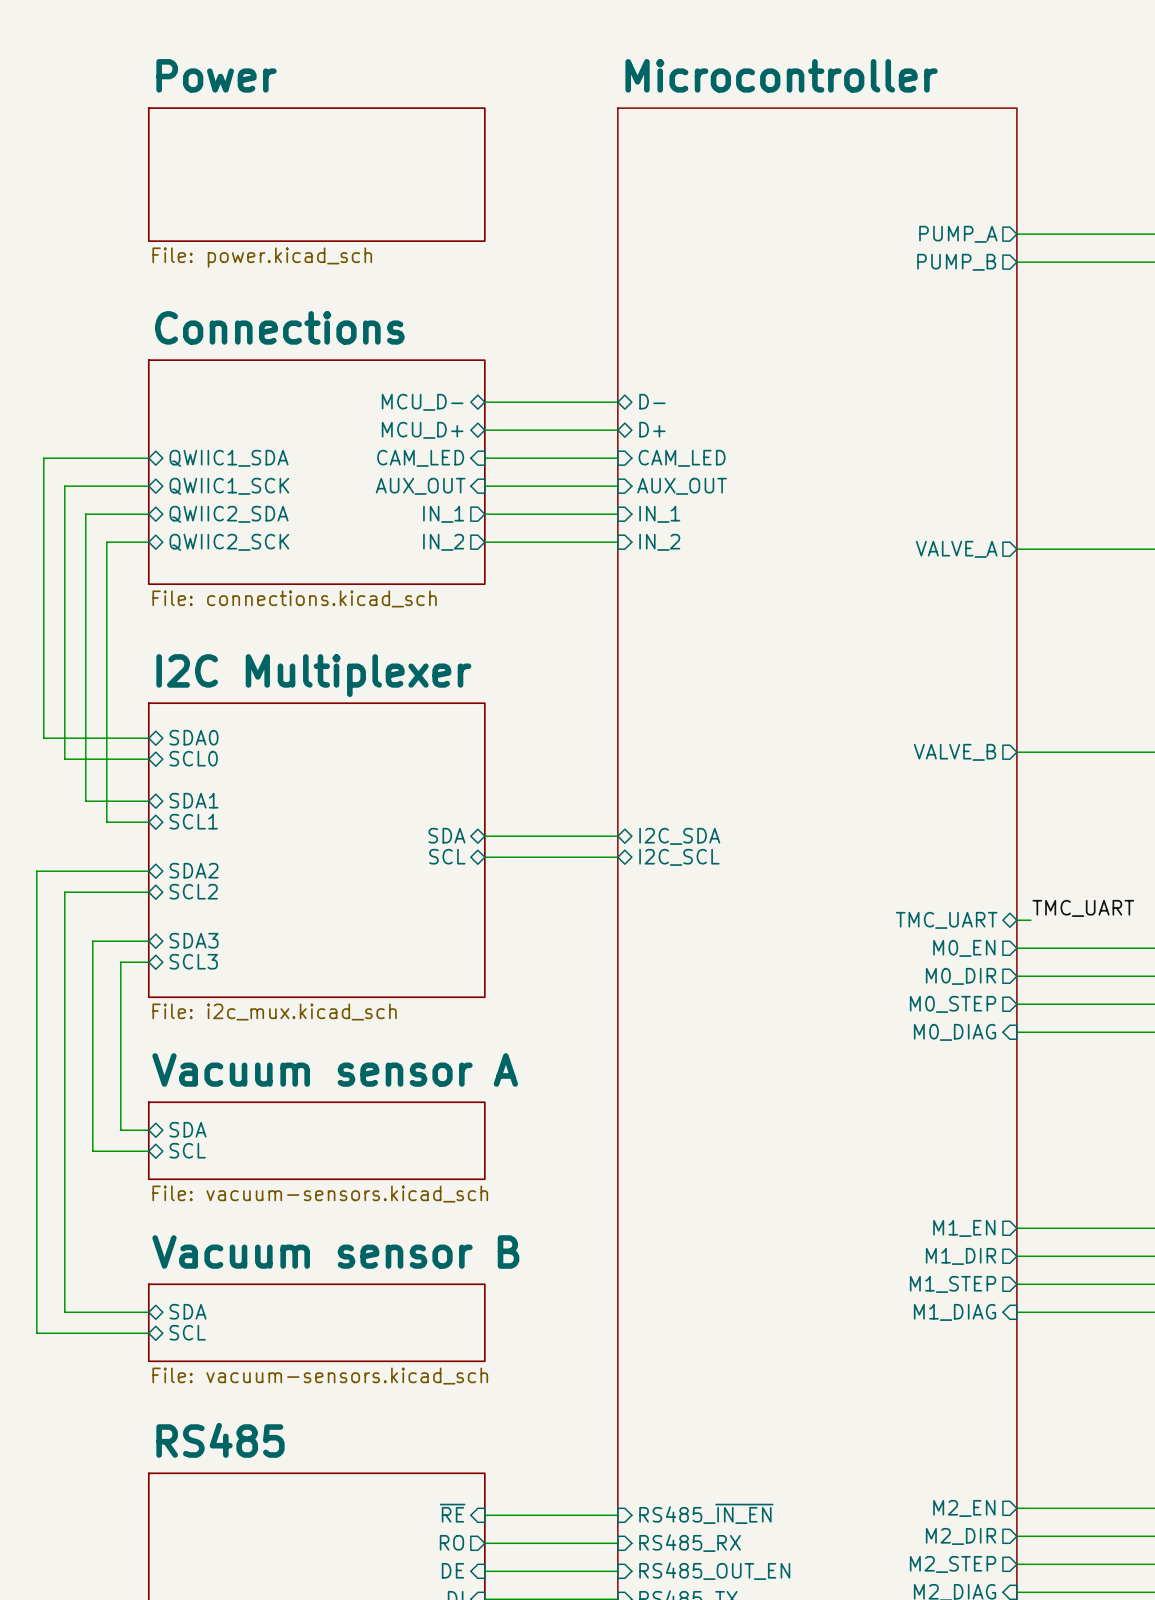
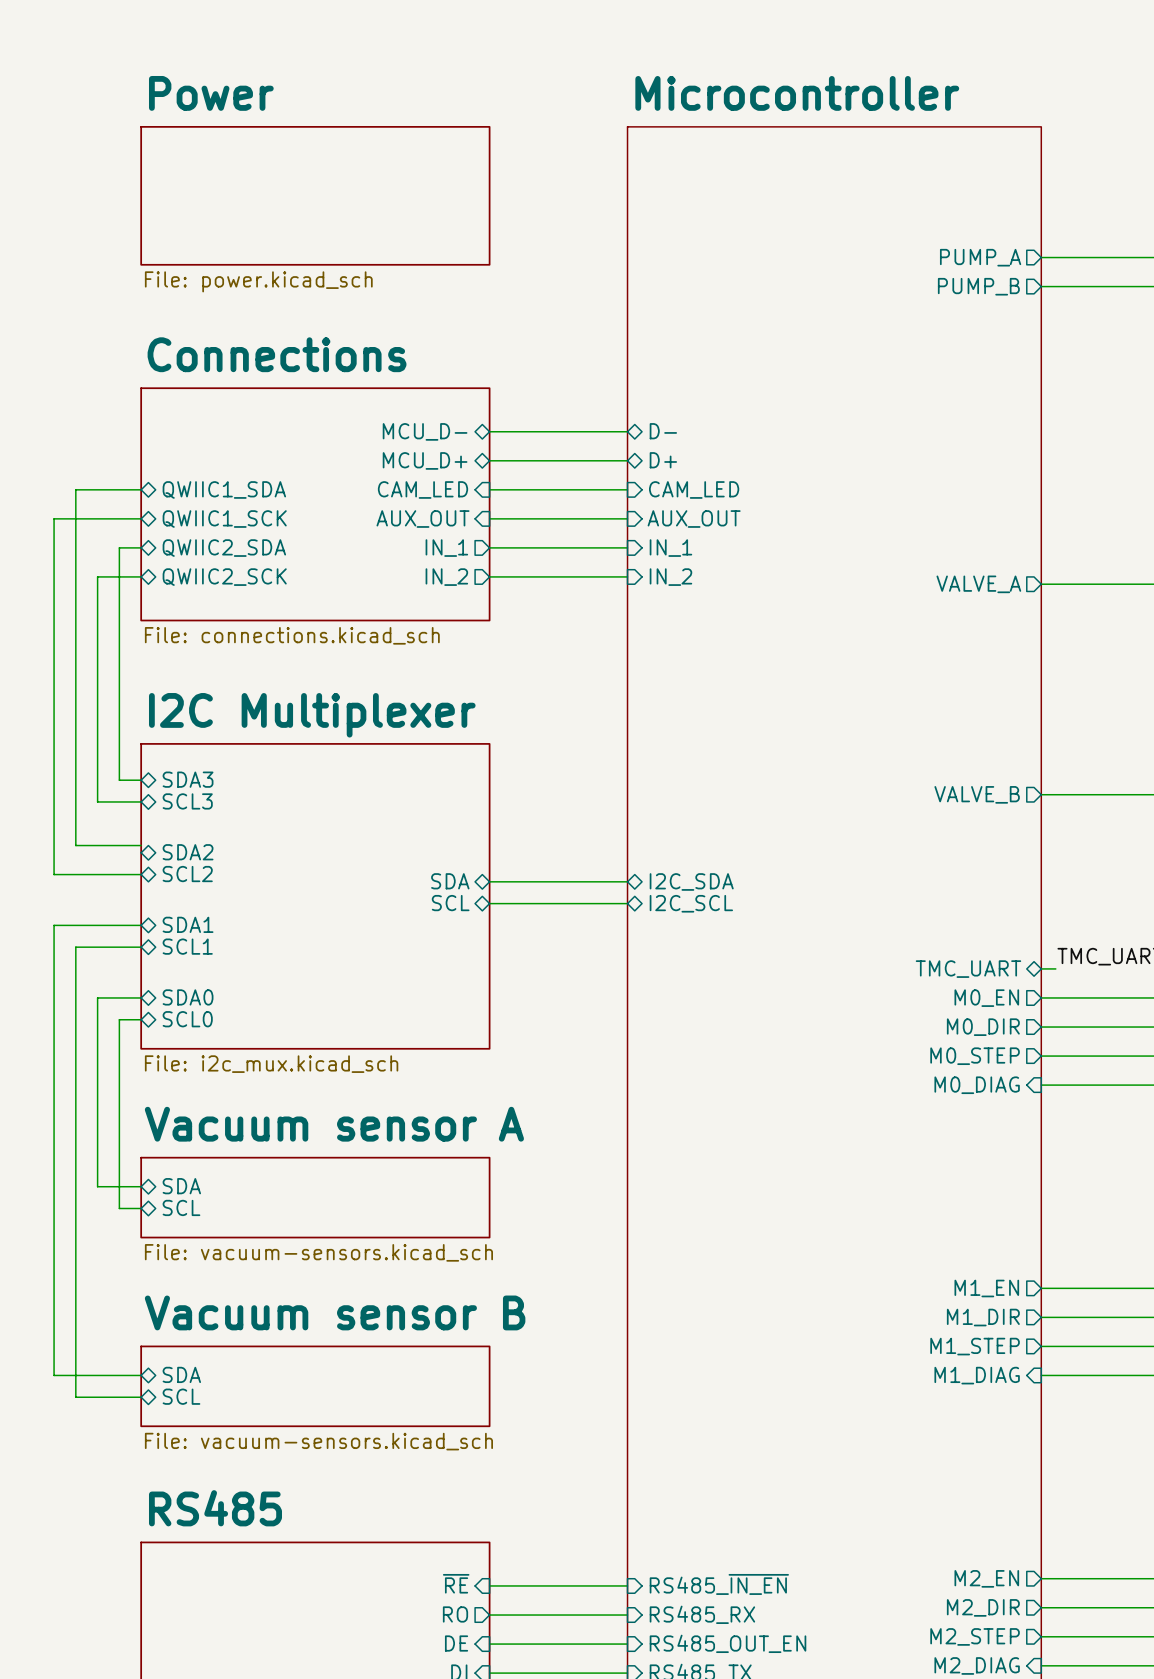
wire: (85, 458) (43, 458) (43, 738) (127, 738) -> (119, 547) (119, 780)
wire: (85, 514) (127, 514) -> (75, 547) (75, 489)
sheet pin: SDA0 (194, 737) -> SDA3 (188, 779)
sheet pin: SCL0 (193, 758) -> SCL3 (187, 801)
wire: (64, 759) (106, 759) (106, 822) (148, 822) -> (54, 801) (54, 874) (141, 874)
sheet pin position: SDA1 (194, 800) -> SDA1 (188, 924)
sheet pin position: SCL1 (193, 821) -> SCL1 (187, 946)
sheet pin position: SDA2 (194, 870) -> SDA2 (188, 852)
wire: (148, 871) (36, 871) (36, 1333) (85, 1333) -> (141, 947) (75, 947) (75, 1397)
sheet pin position: SCL2 (193, 891) -> SCL2 (187, 874)
wire: (64, 892) (148, 892) -> (54, 939) (54, 925) (141, 925)
sheet pin: SDA3 (194, 940) -> SDA0 (188, 997)
wire: (148, 941) (92, 941) (92, 1151) (127, 1151) -> (141, 1019) (119, 1019) (119, 1208)
sheet pin: SCL3 (193, 961) -> SCL0 (187, 1019)
wire: (148, 962) (120, 962) (120, 1130) -> (141, 997) (97, 997) (97, 1186) (112, 1186)

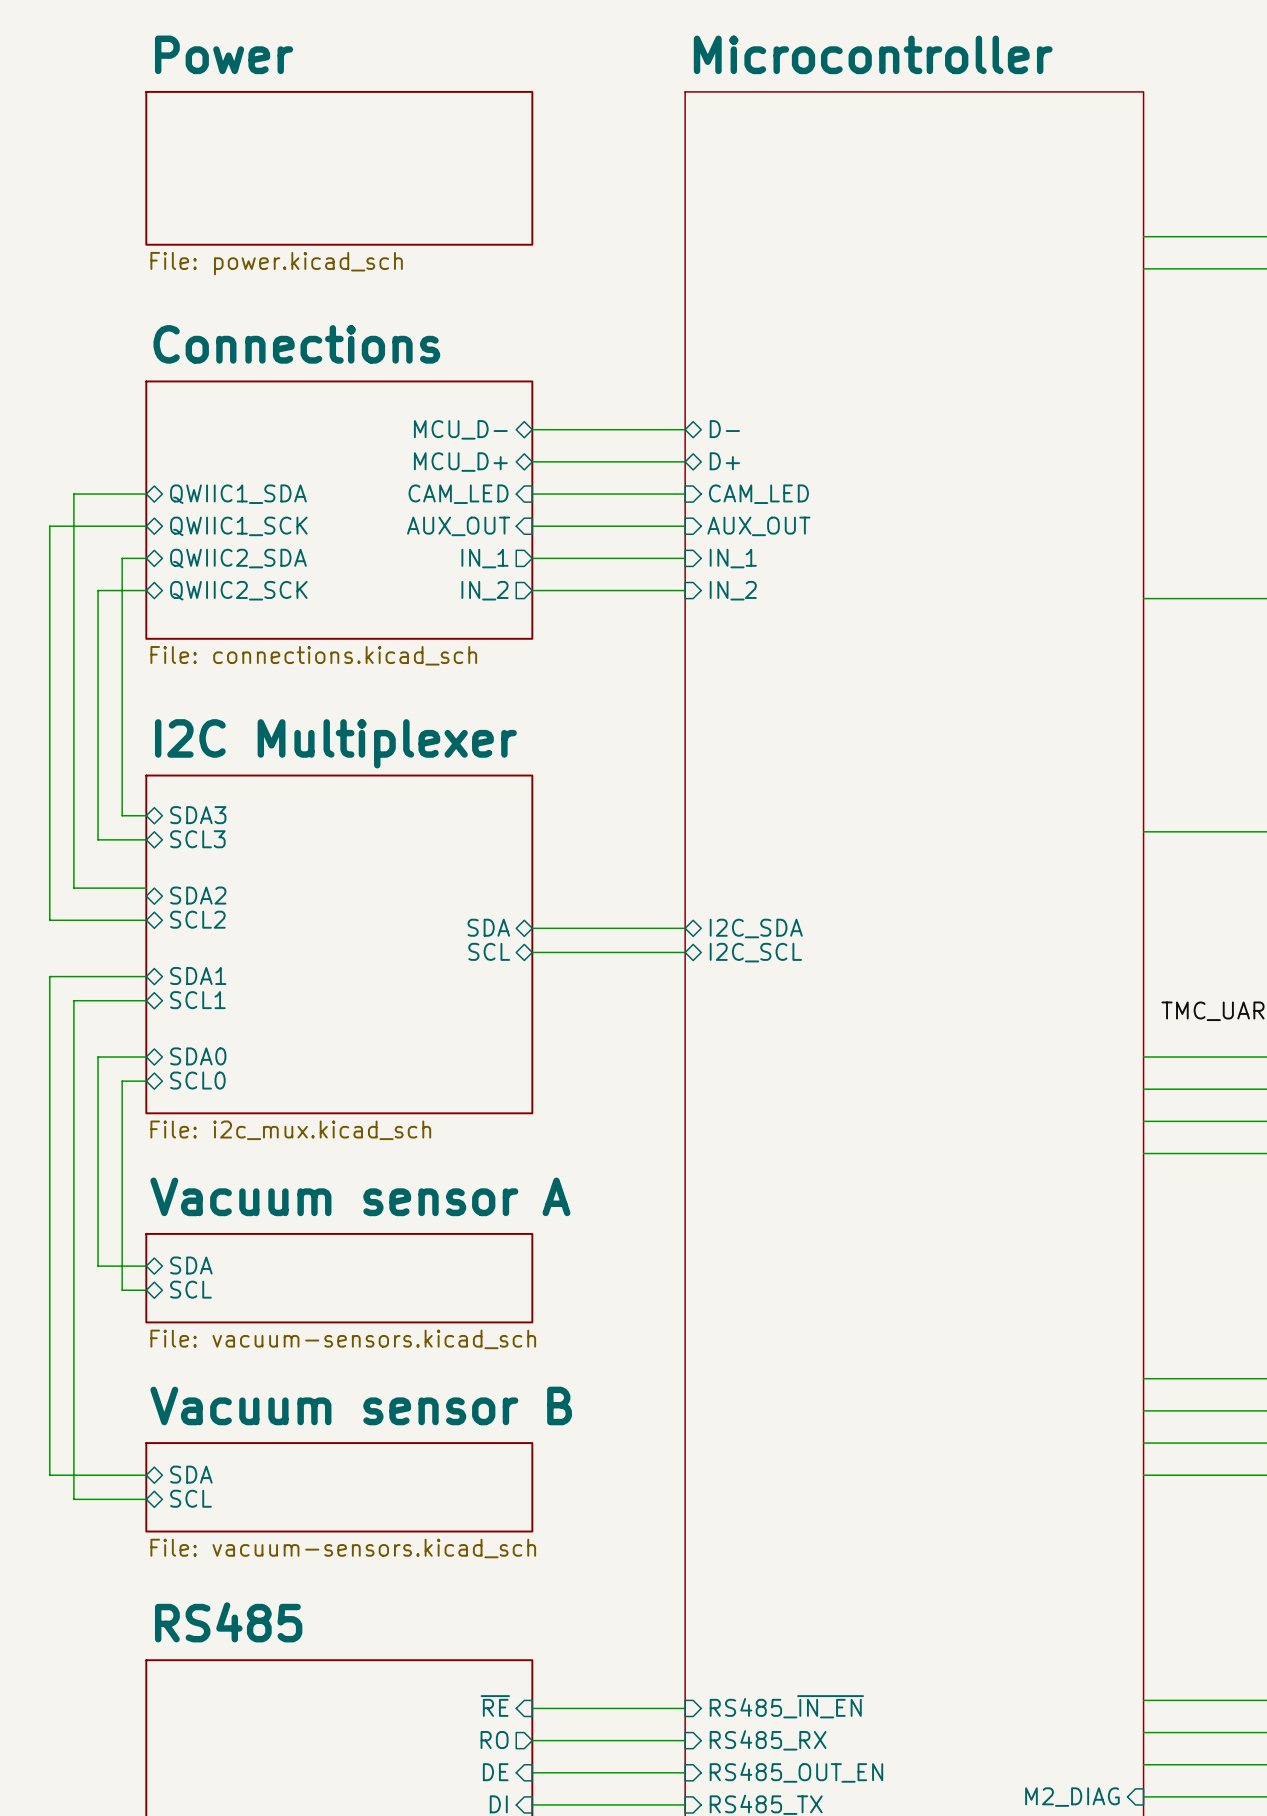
sheet pin: PUMP_A (980, 257) -> none
sheet pin: PUMP_B (978, 286) -> none
sheet pin: VALVE_A (978, 584) -> none
sheet pin: VALVE_B (977, 794) -> none
wire: (1041, 968) (1055, 968) -> none
sheet pin: TMC_UART (968, 969) -> none
sheet pin: M0_EN (986, 998) -> none
sheet pin: M0_DIR (983, 1027) -> none
sheet pin: M0_STEP (975, 1056) -> none
sheet pin: M0_DIAG (977, 1085) -> none
sheet pin: M1_EN (986, 1288) -> none
sheet pin: M1_DIR (983, 1317) -> none
sheet pin: M1_STEP (975, 1346) -> none
sheet pin: M1_DIAG (977, 1375) -> none
sheet pin: M2_EN (986, 1578) -> none
sheet pin: M2_DIR (983, 1607) -> none
sheet pin: M2_STEP (975, 1636) -> none

